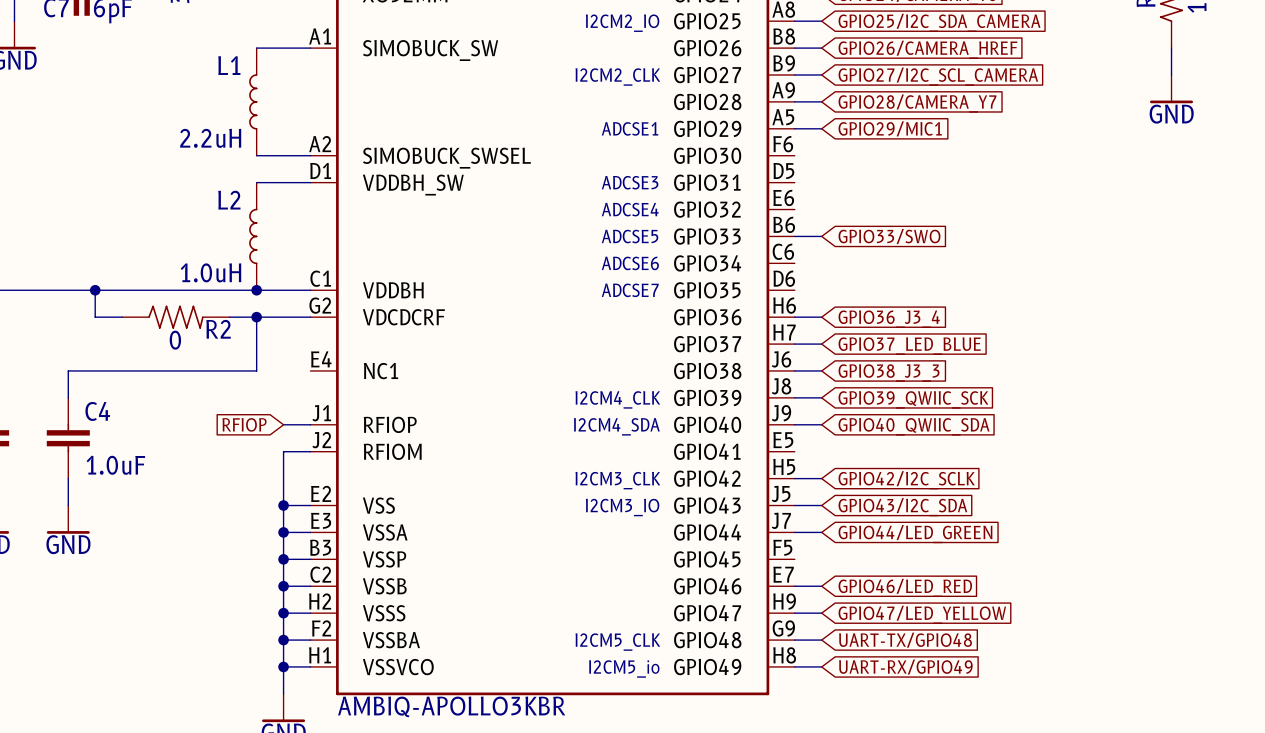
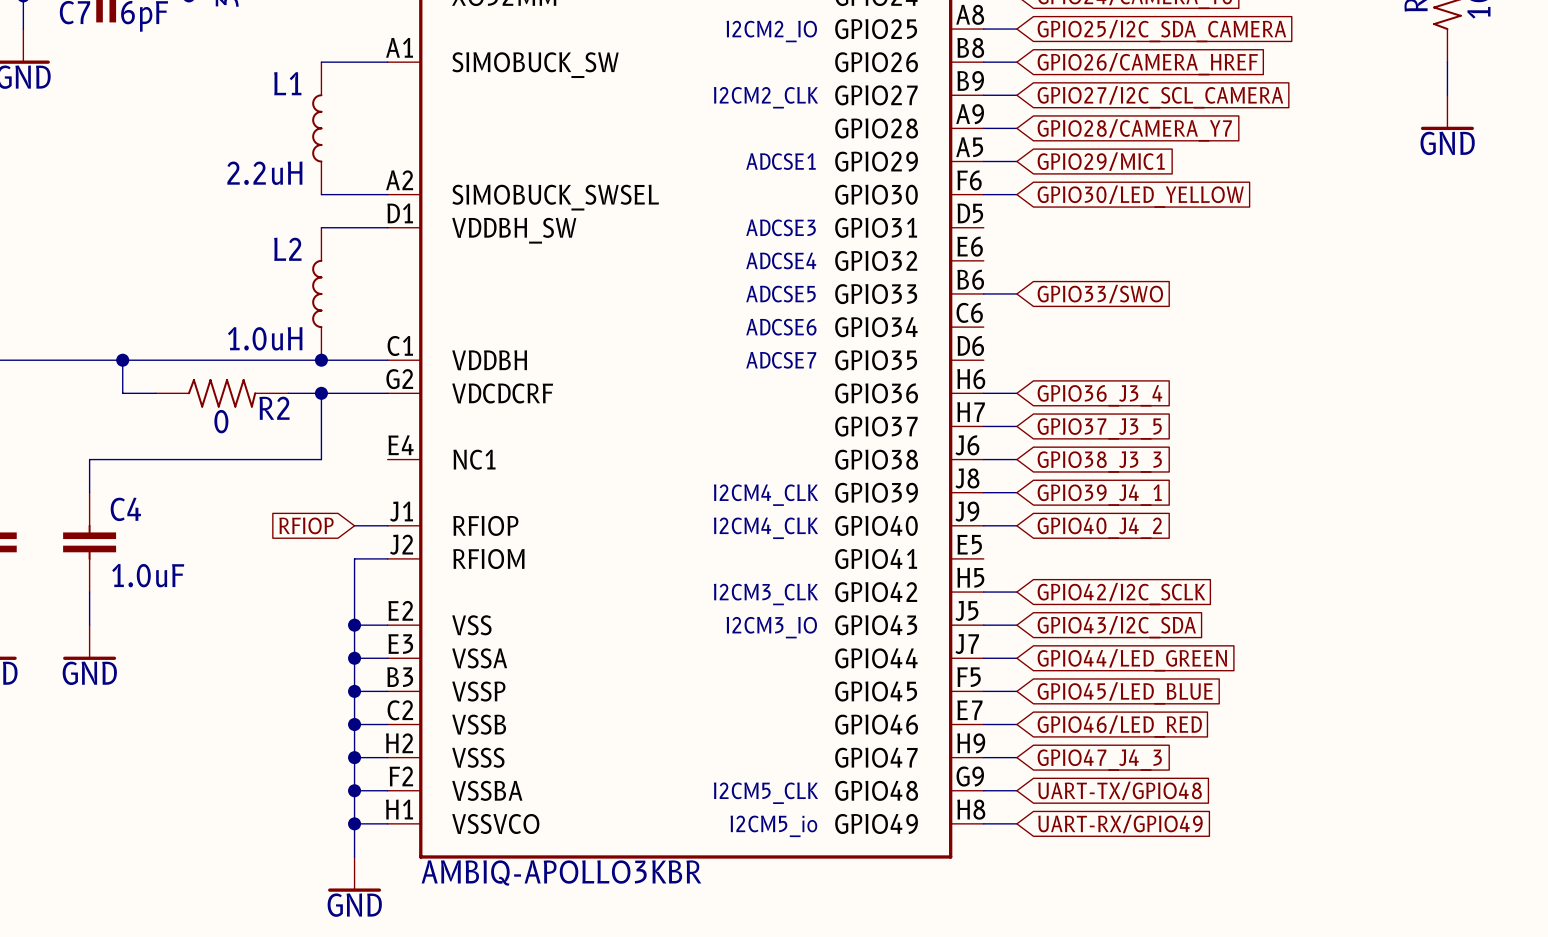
wire: none -> (983, 194) (1016, 194)
global label: none -> GPIO30/LED_YELLOW (1140, 196)
global label: GPIO37_LED_BLUE (909, 346) -> GPIO37_J3_5 (1099, 428)
global label: GPIO39_QWIIC_SCK (913, 399) -> GPIO39_J4_1 (1099, 495)
text: I2CM4_SDA (616, 426) -> I2CM4_CLK (765, 528)
global label: GPIO40_QWIIC_SDA (914, 426) -> GPIO40_J4_2 (1099, 528)
wire: none -> (983, 691) (1016, 691)
global label: none -> GPIO45/LED_BLUE (1125, 693)
global label: GPIO47/LED_YELLOW (922, 614) -> GPIO47_J4_3 (1099, 760)

